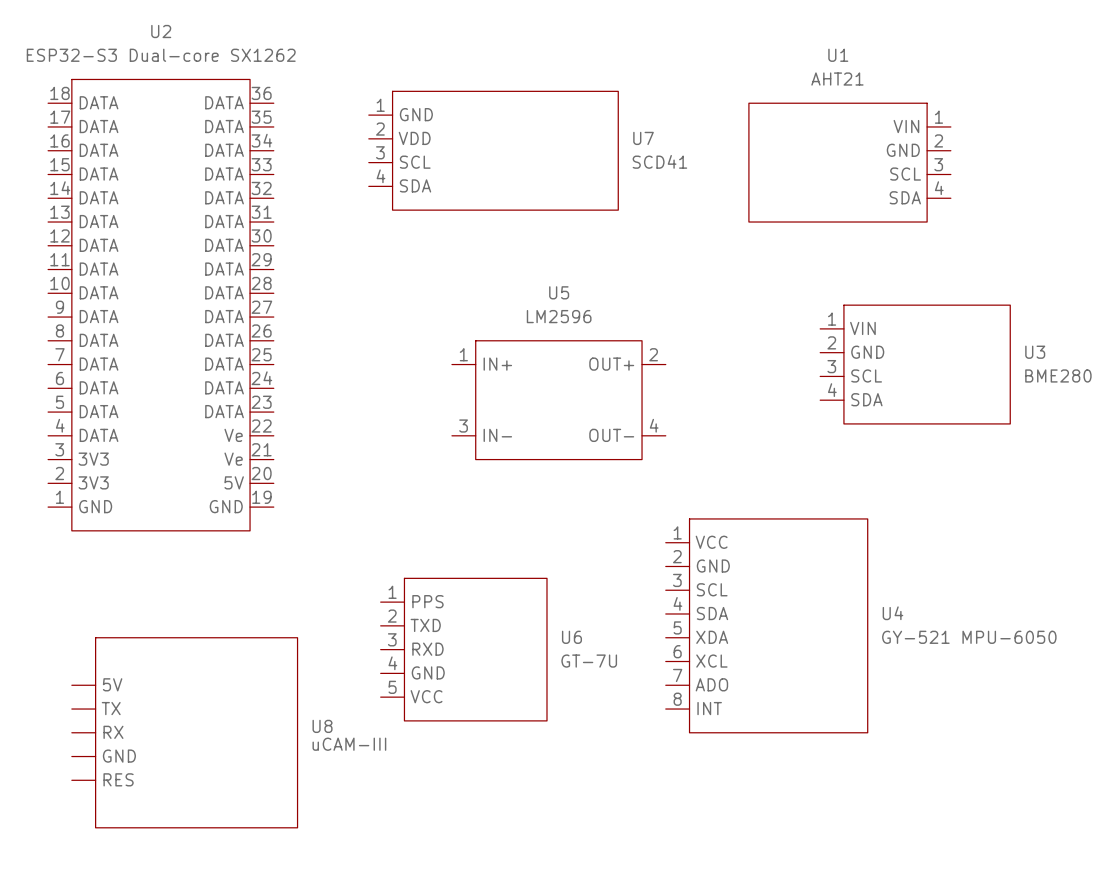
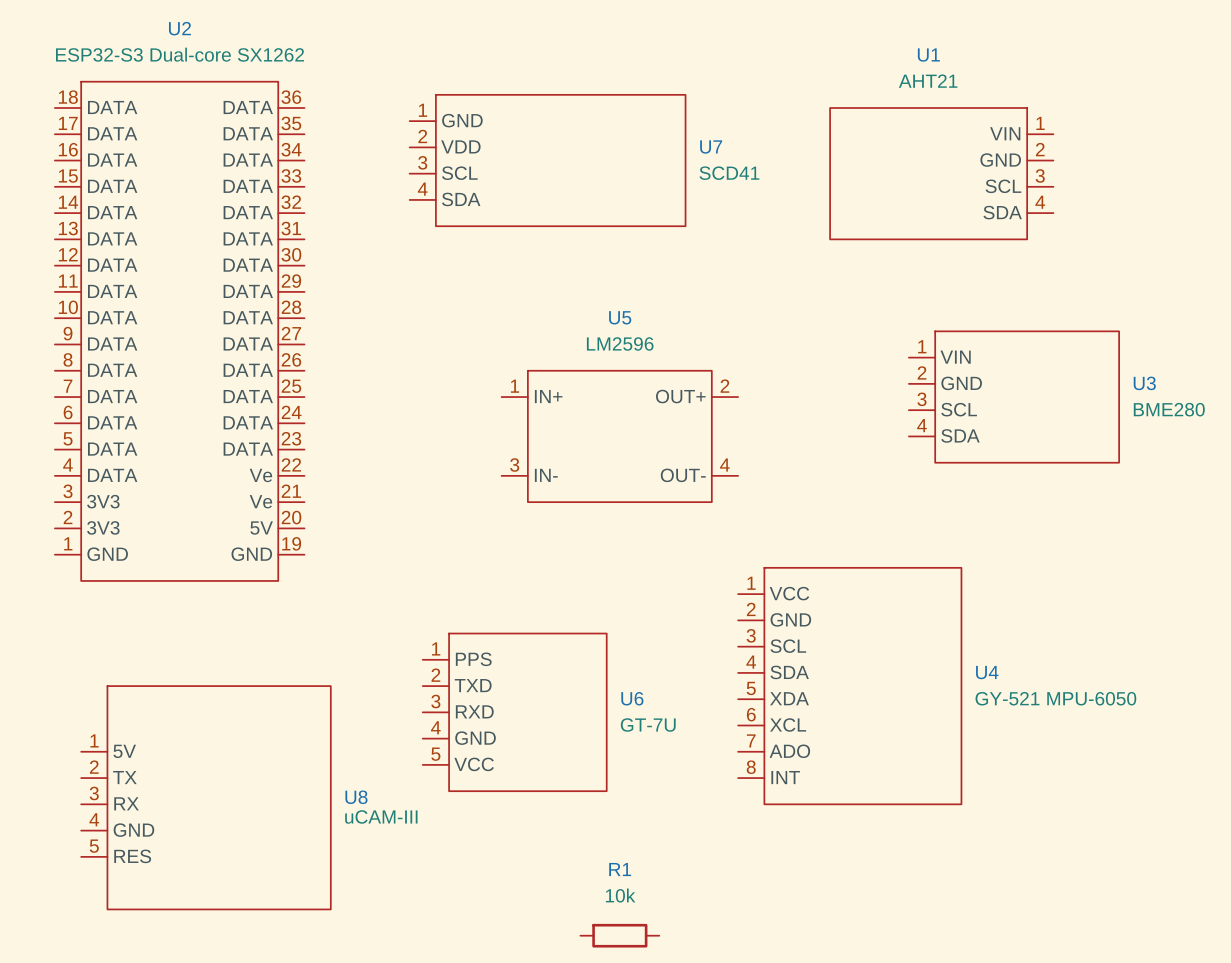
U8 symbol: [71, 637, 298, 828] -> [81, 686, 331, 910]
R1: none -> 10k (619, 935)

